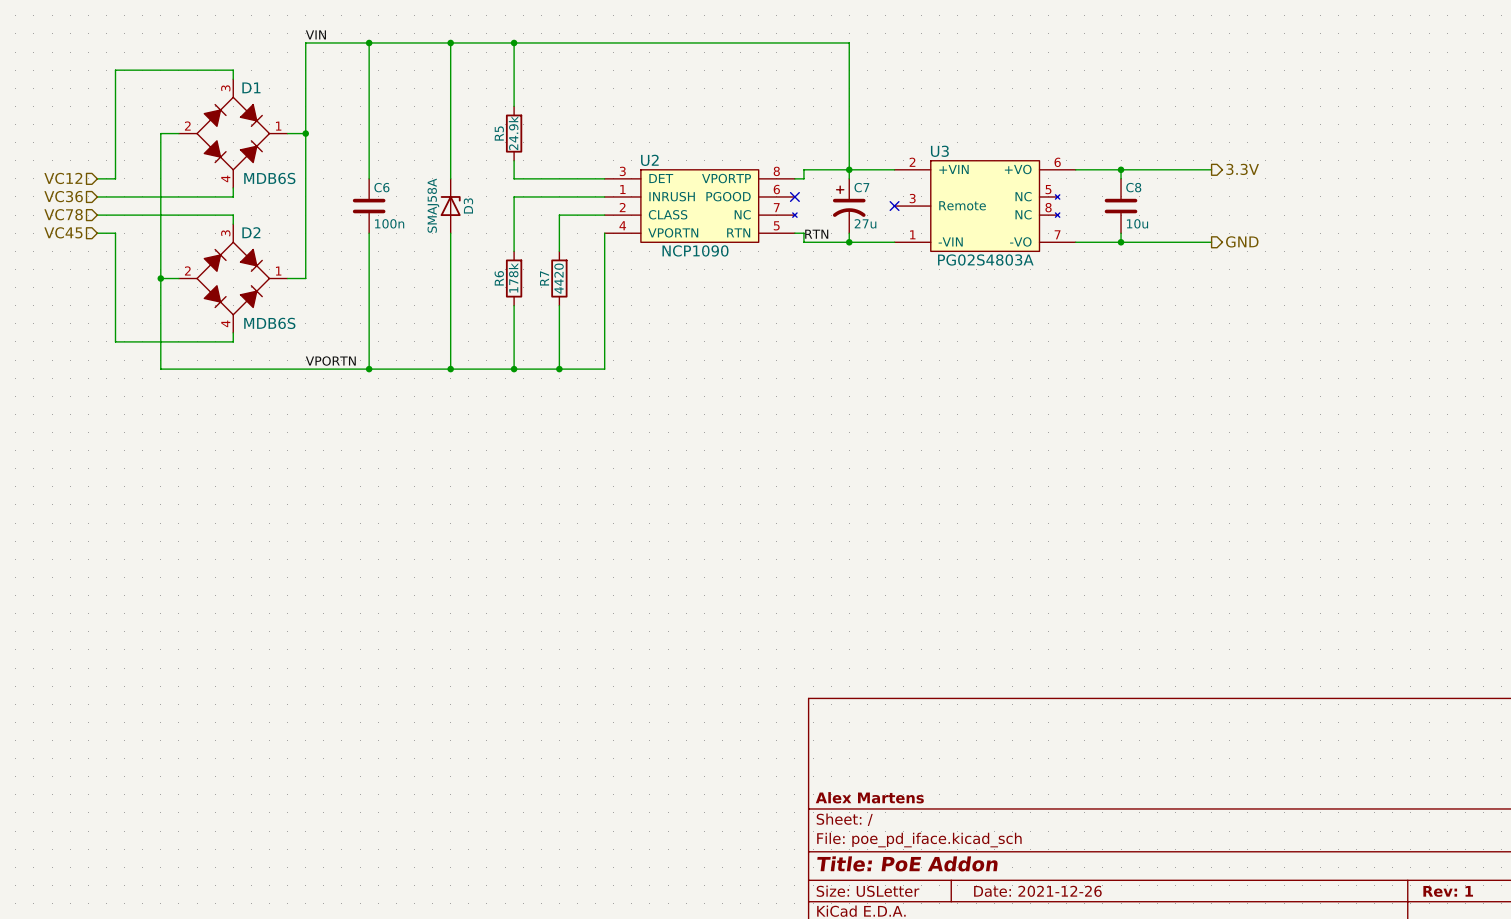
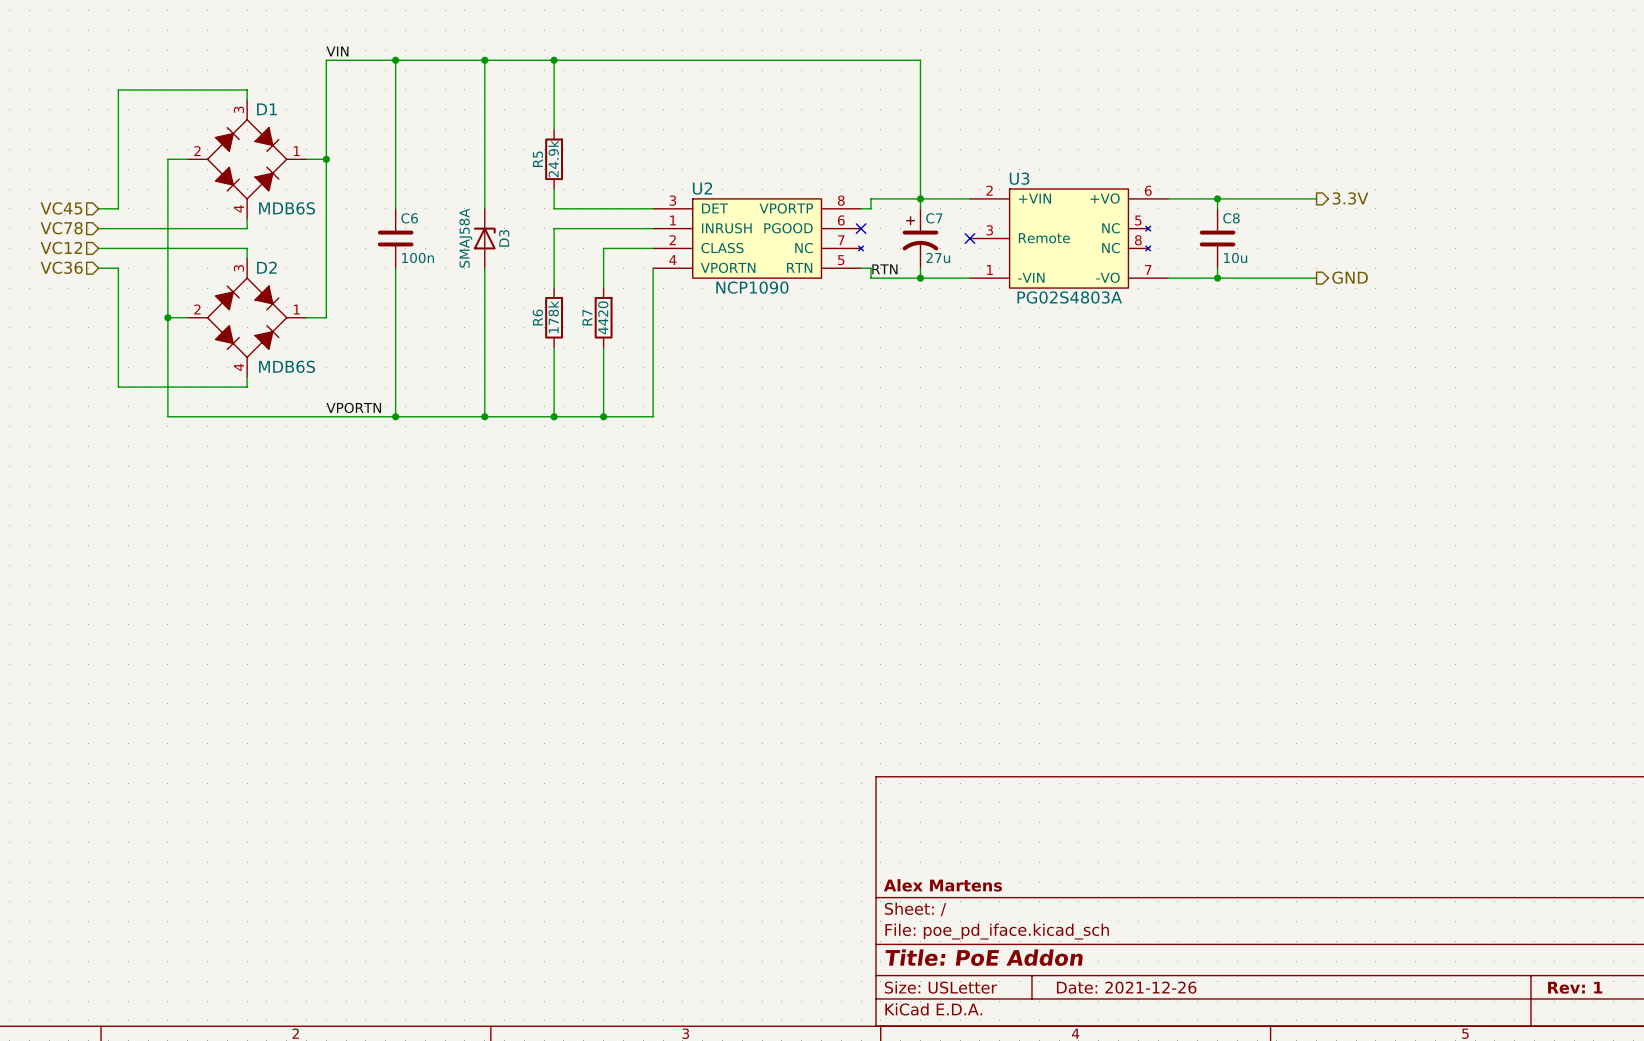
hierarchical label: VC12 (63, 178) -> VC45 (61, 208)
hierarchical label: VC36 (63, 196) -> VC78 (61, 228)
hierarchical label: VC78 (63, 214) -> VC12 (61, 247)
hierarchical label: VC45 (63, 232) -> VC36 (61, 267)

